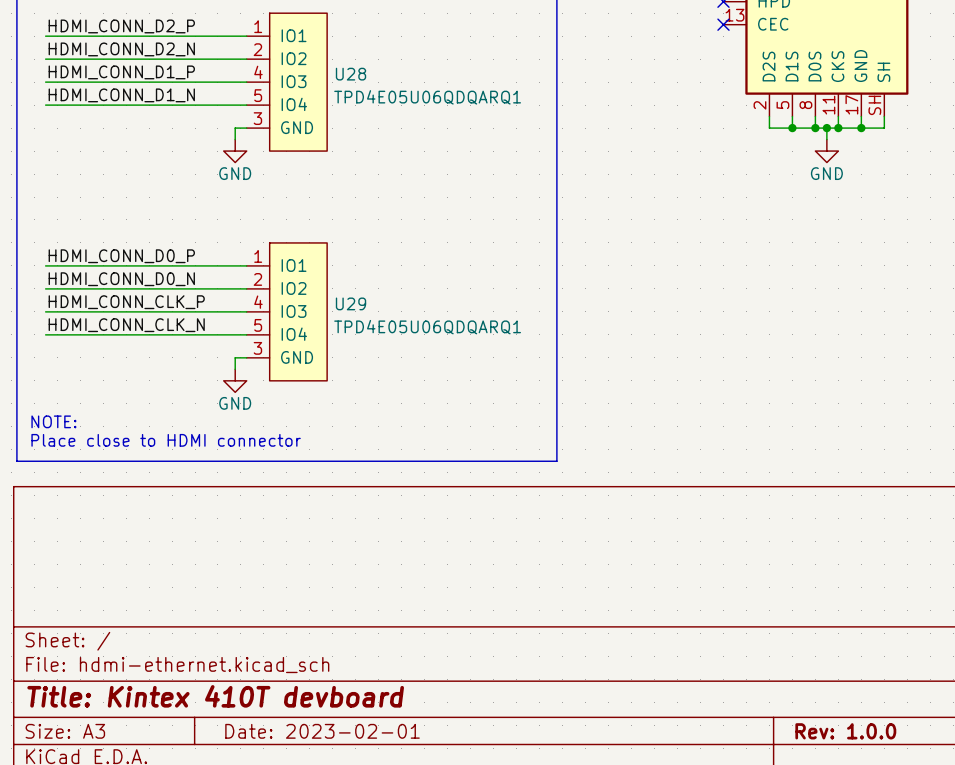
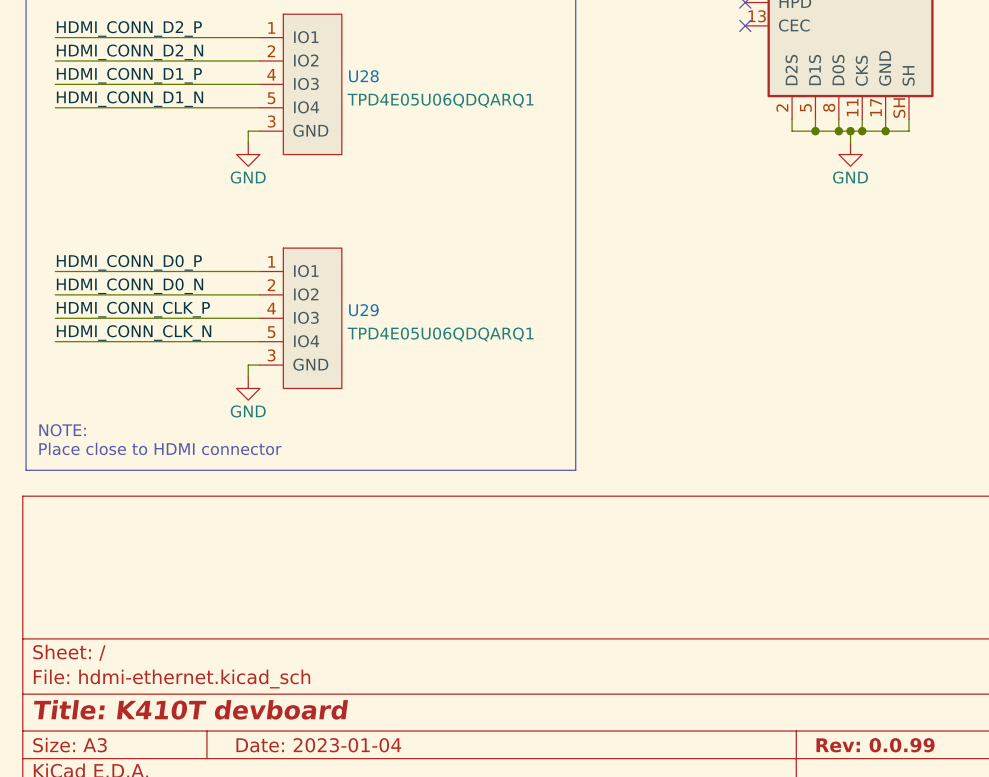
title block: Title: Kintex 410T devboard (215, 696) -> Title: K410T devboard (190, 709)
title block: Date: 2023-02-01 (322, 731) -> Date: 2023-01-04 (318, 745)
title block: Rev: 1.0.0 (845, 731) -> Rev: 0.0.99 (875, 745)

